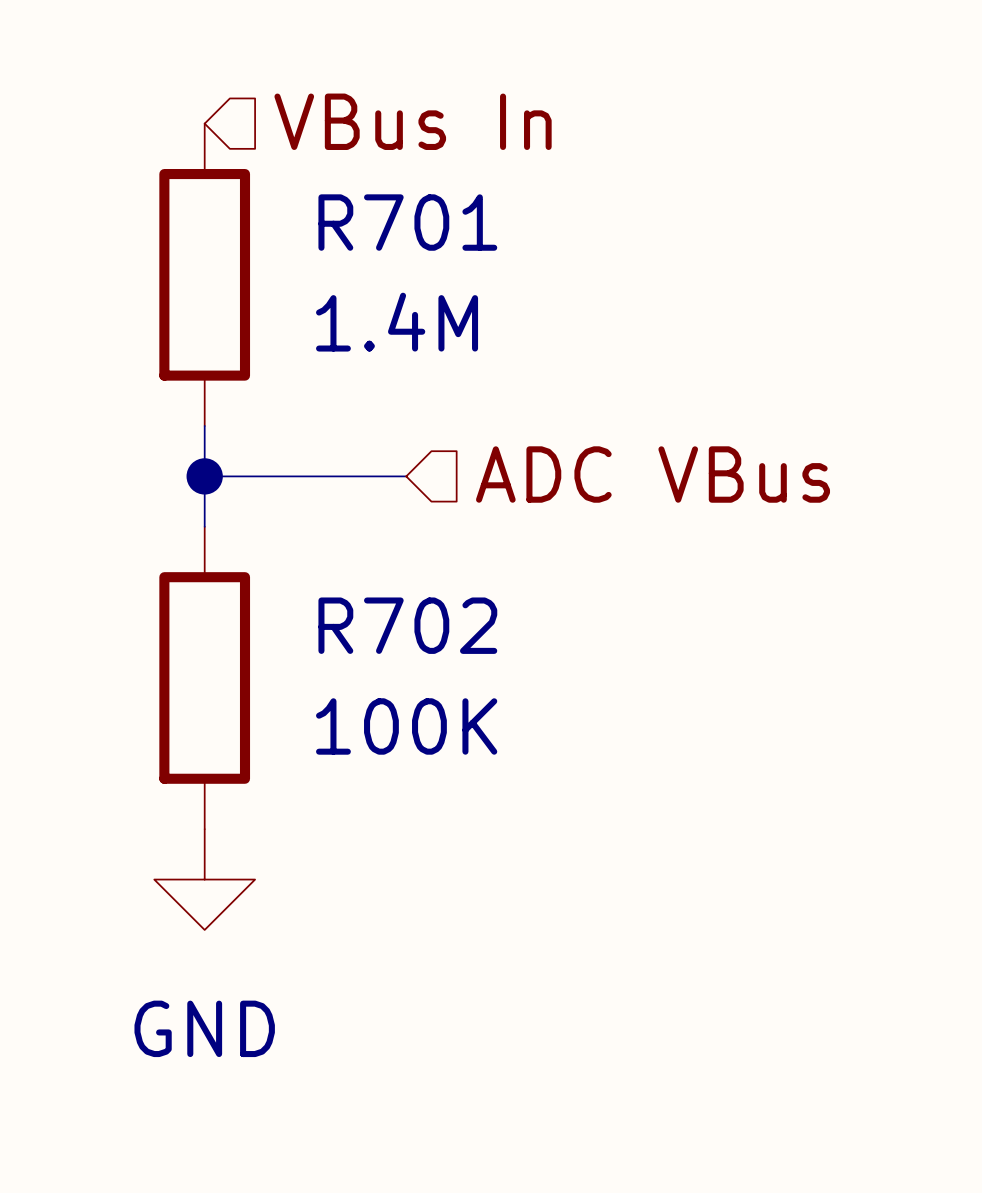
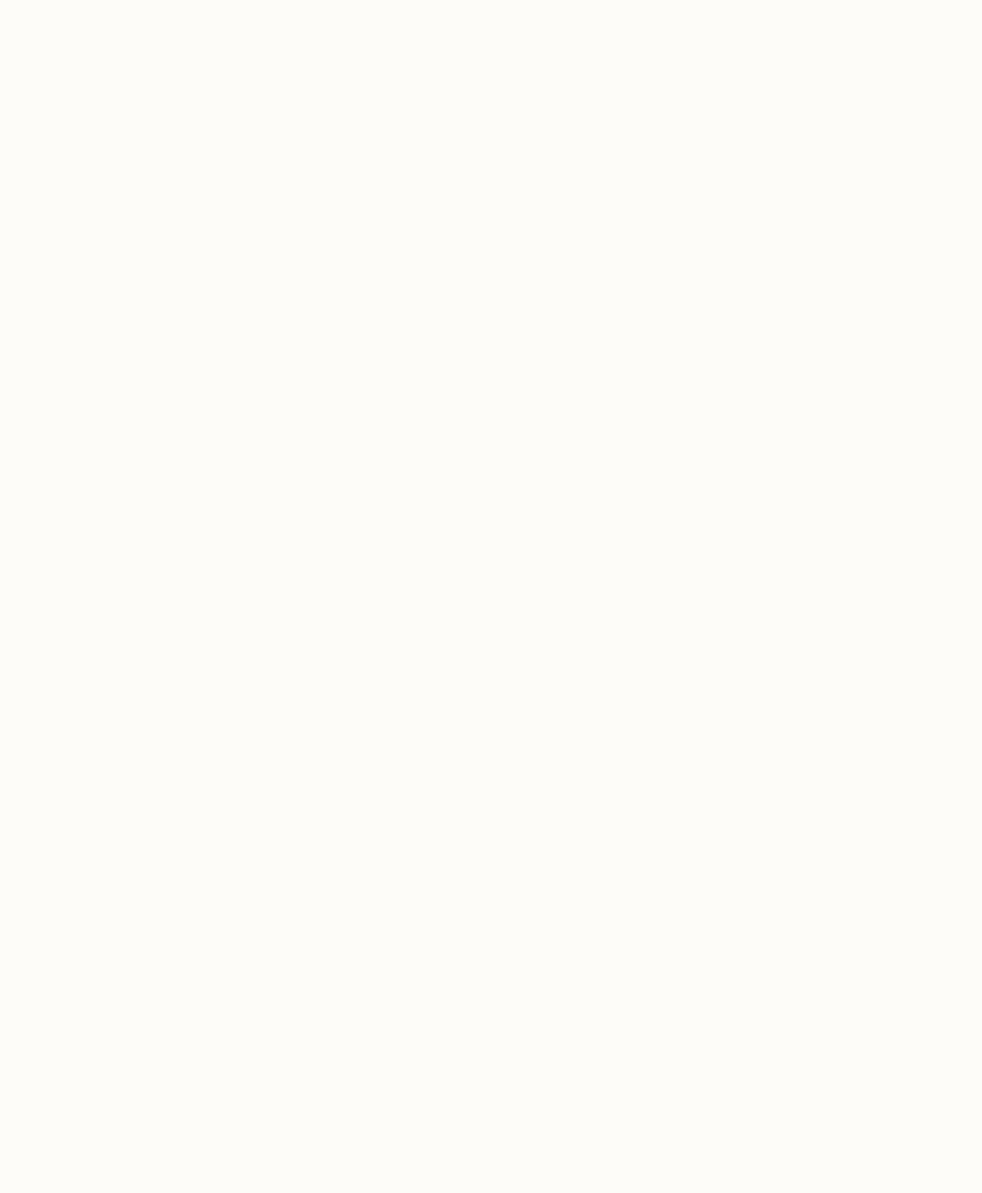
hierarchical label: VBus In (413, 121) -> none
R701: 1.4M (204, 274) -> none
wire: (204, 426) (204, 526) -> none
hierarchical label: ADC VBus (653, 474) -> none
wire: (204, 476) (406, 476) -> none
junction: (204, 476) -> none
R702: 100K (204, 677) -> none
power symbol: GND (204, 879) -> none

